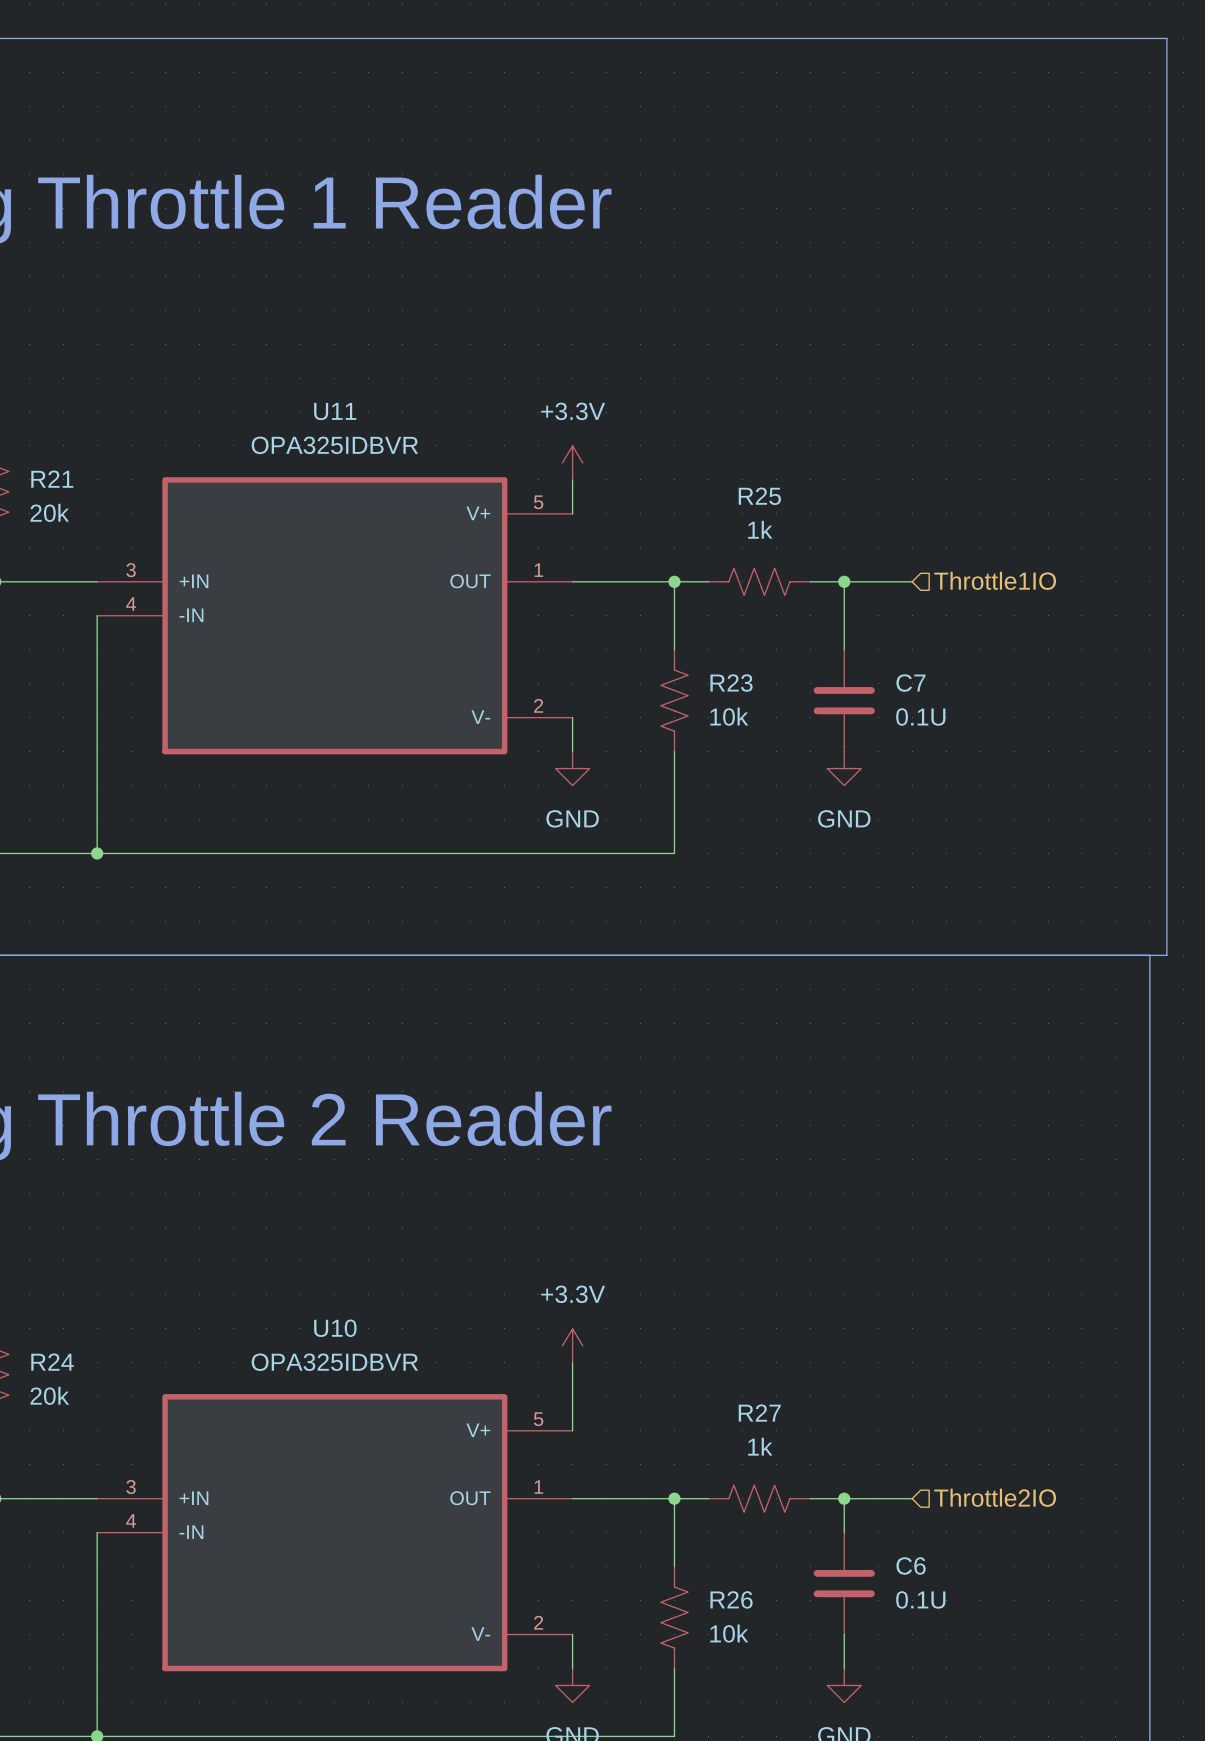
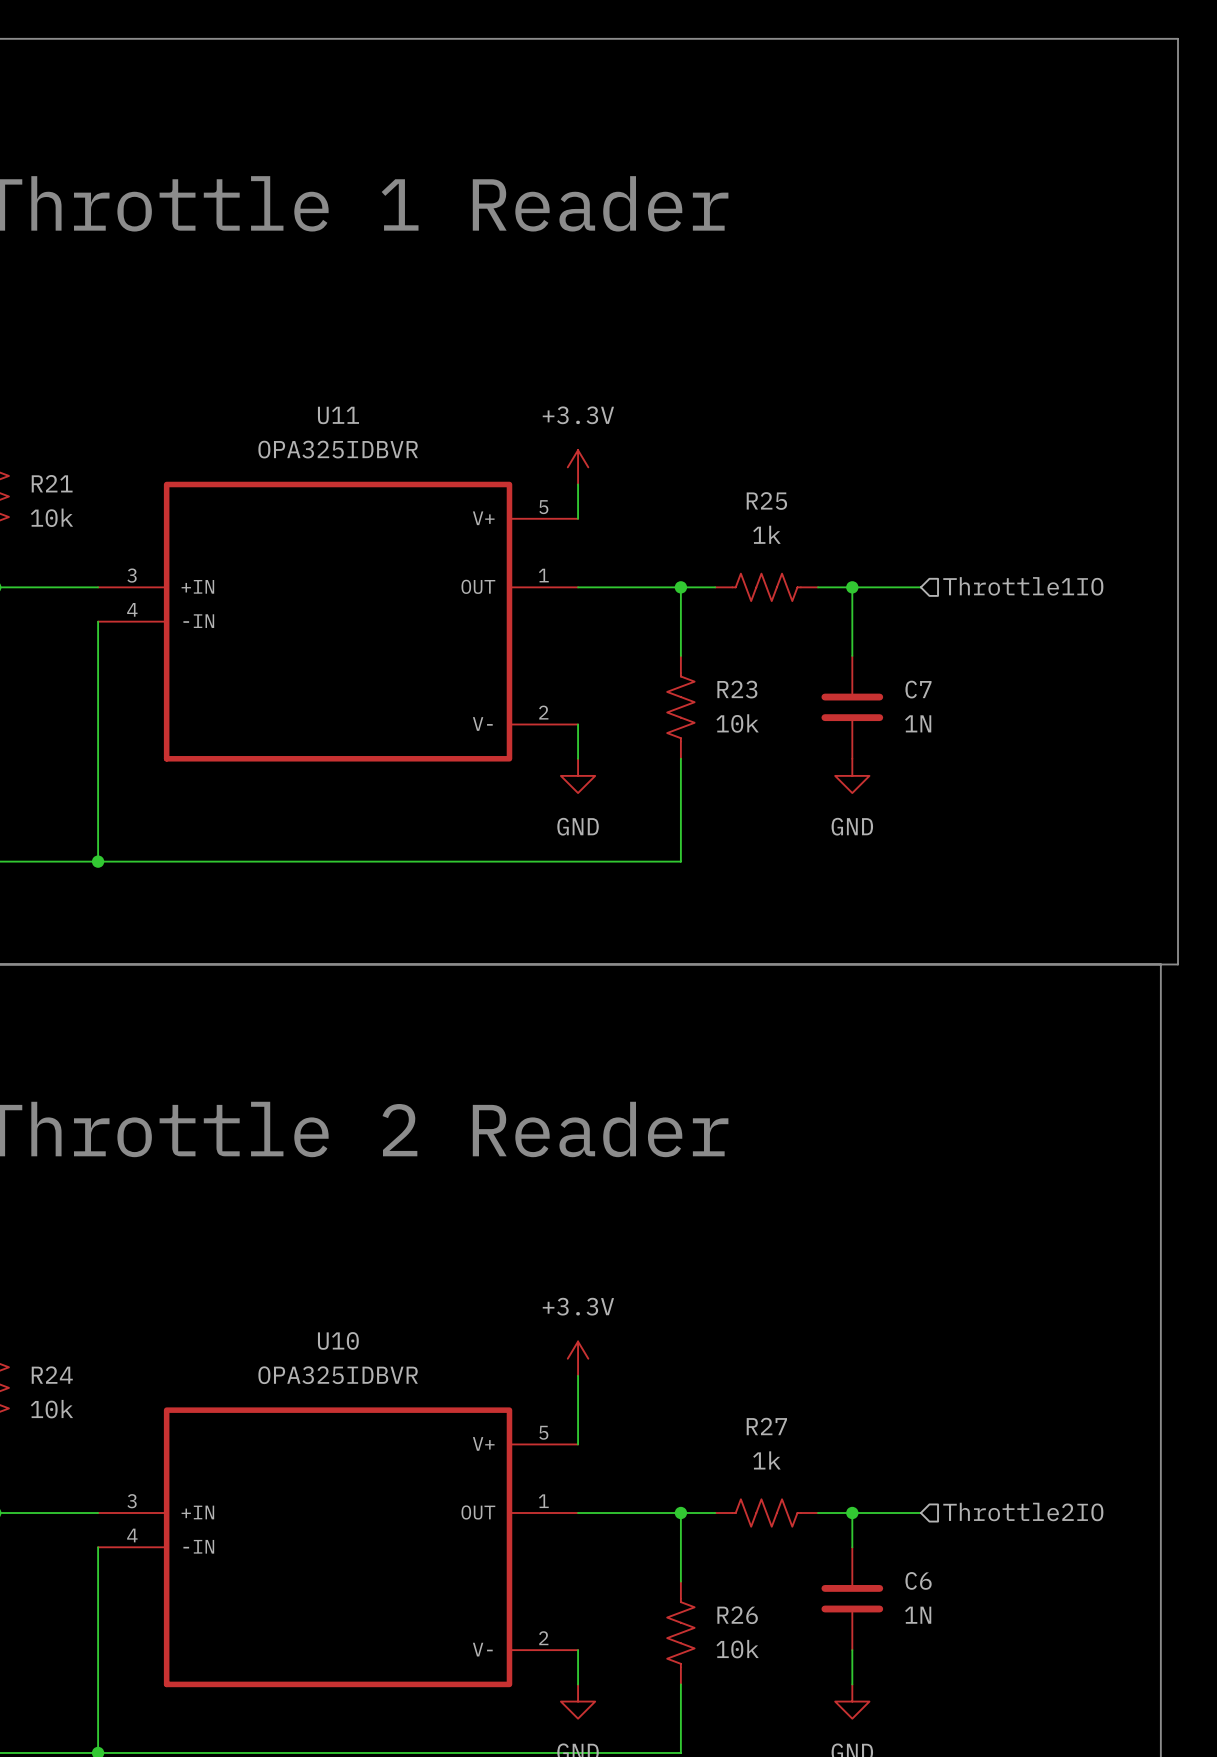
R21 value: 20k (49, 512) -> 10k (51, 517)
C7 value: 0.1U (920, 717) -> 1N (918, 723)
R24 value: 20k (49, 1395) -> 10k (51, 1409)
C6 value: 0.1U (920, 1599) -> 1N (918, 1615)

